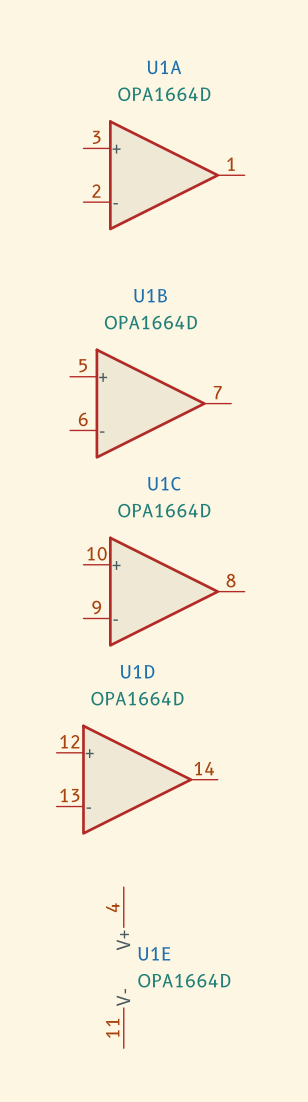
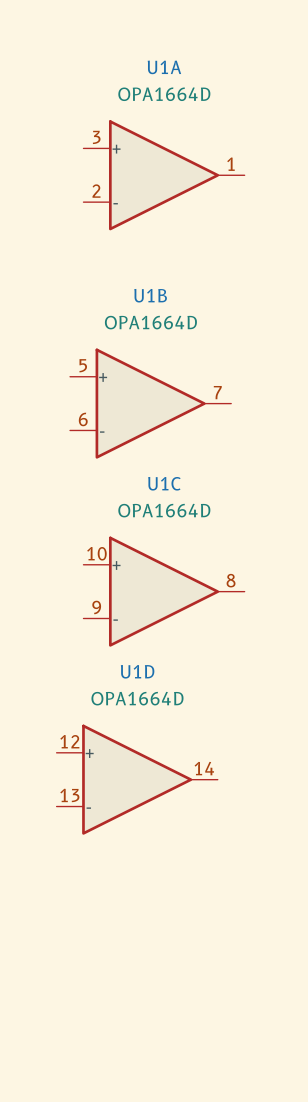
U1E: OPA1664D (123, 967) -> none

